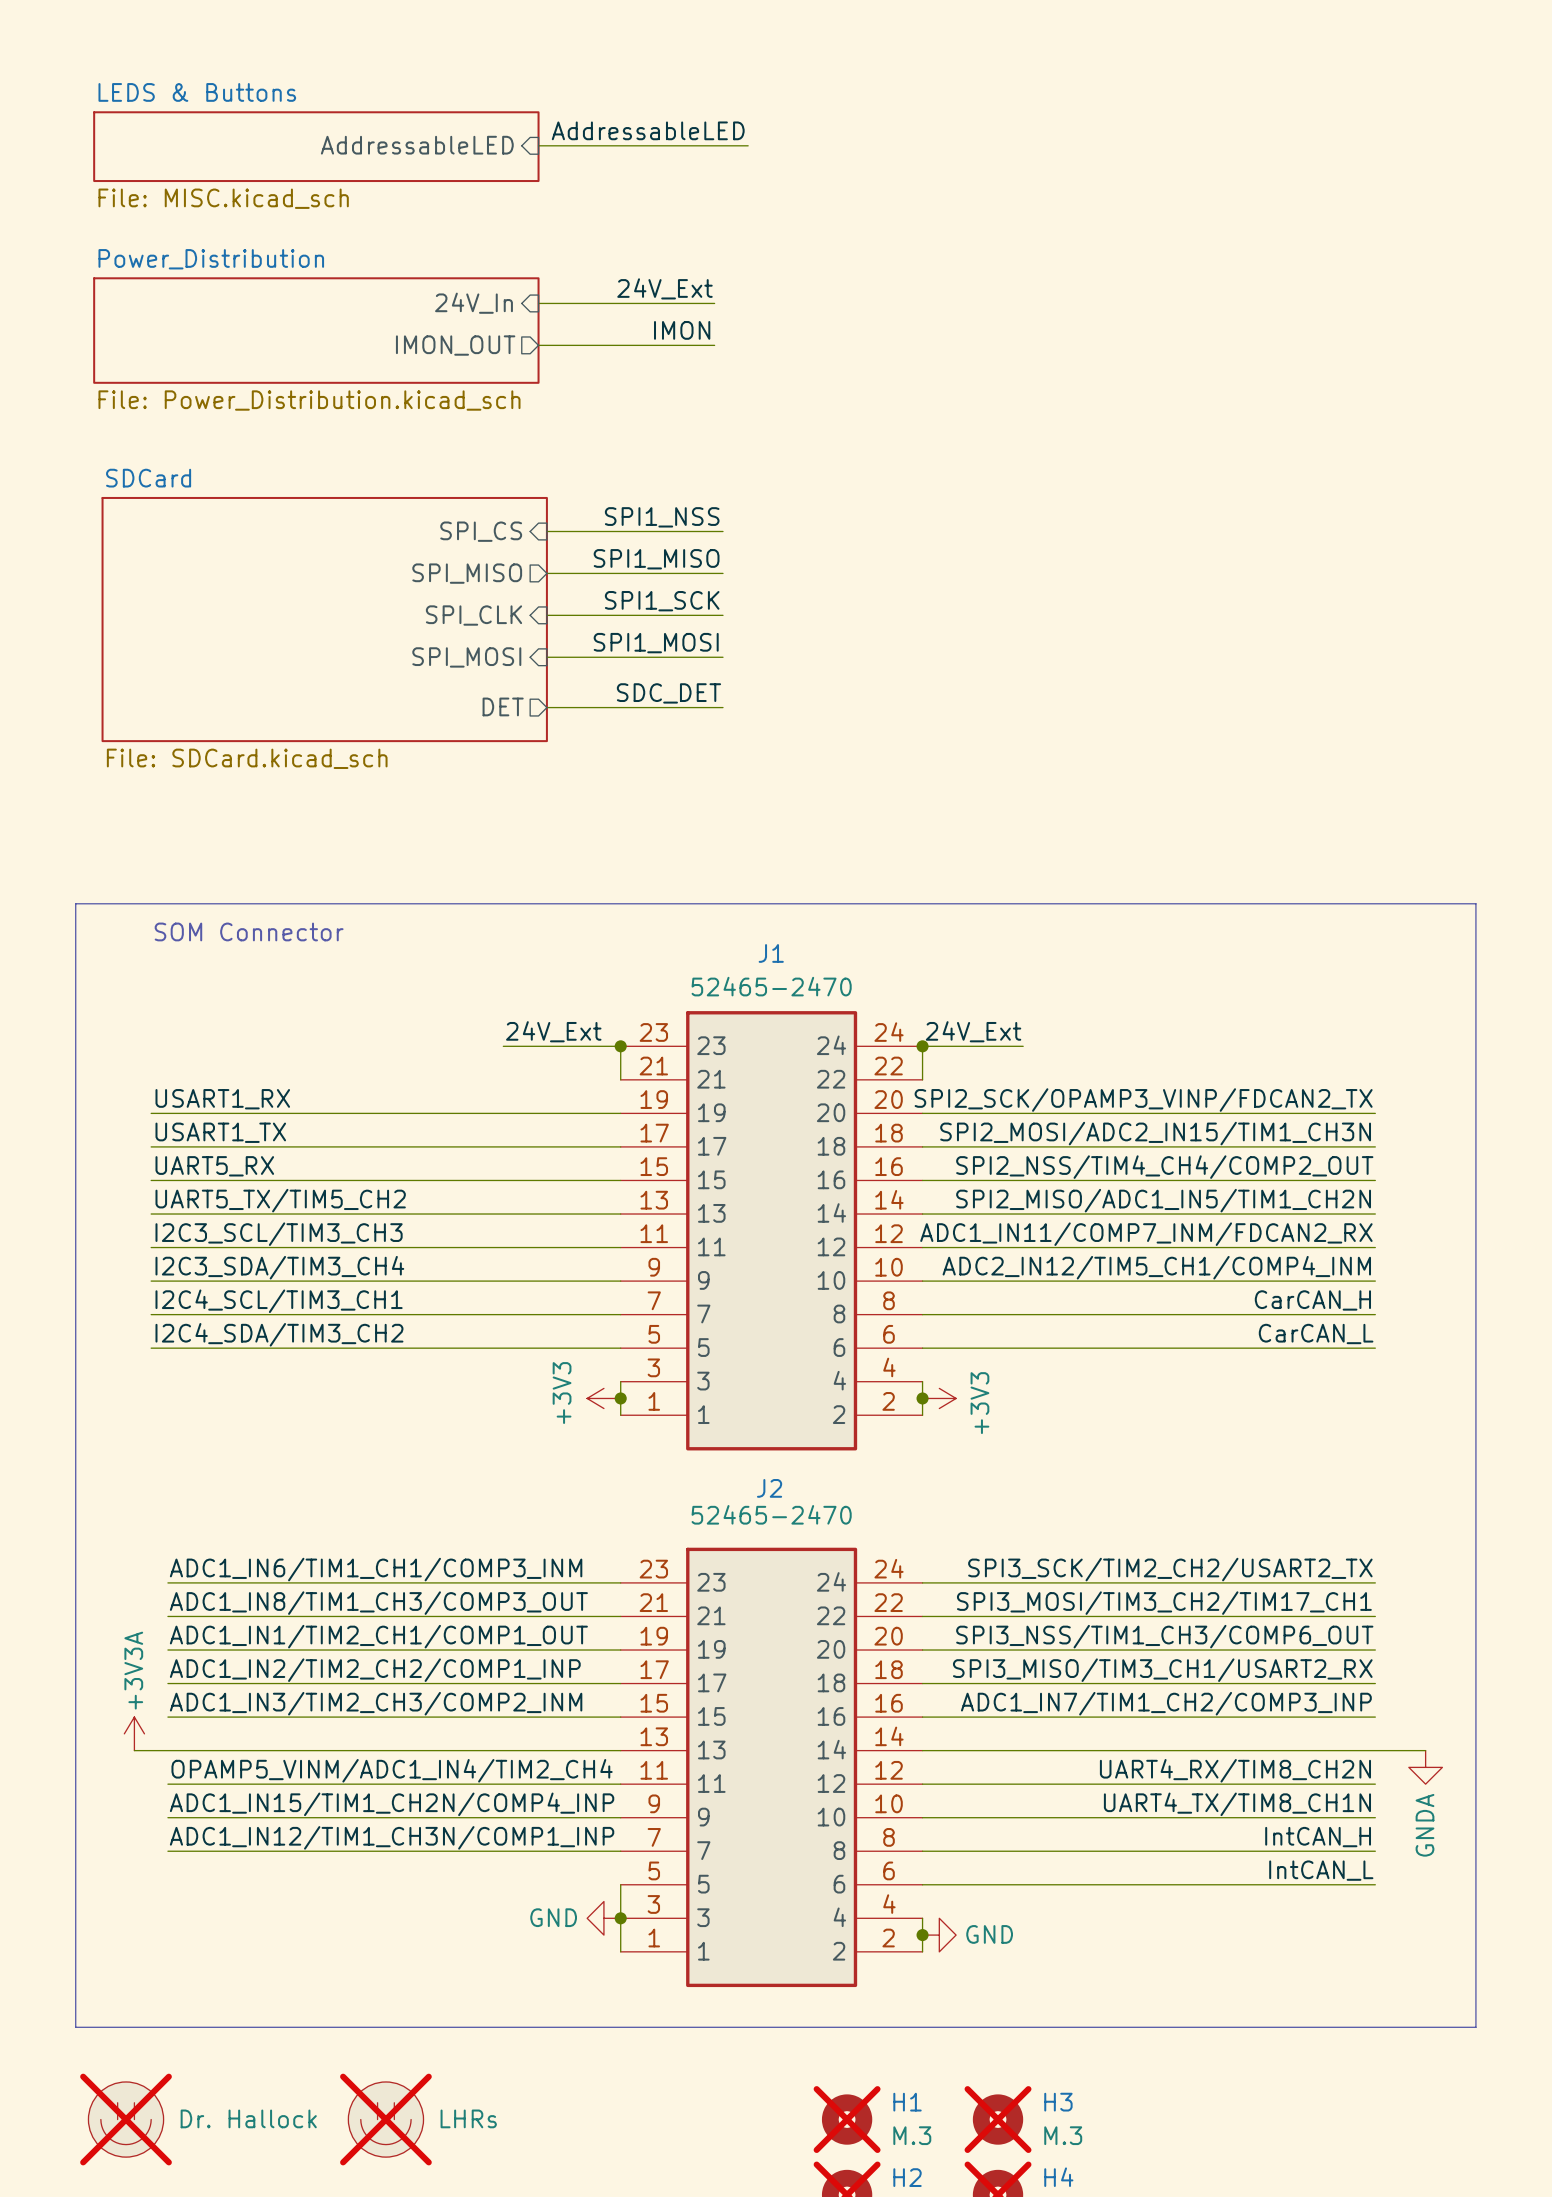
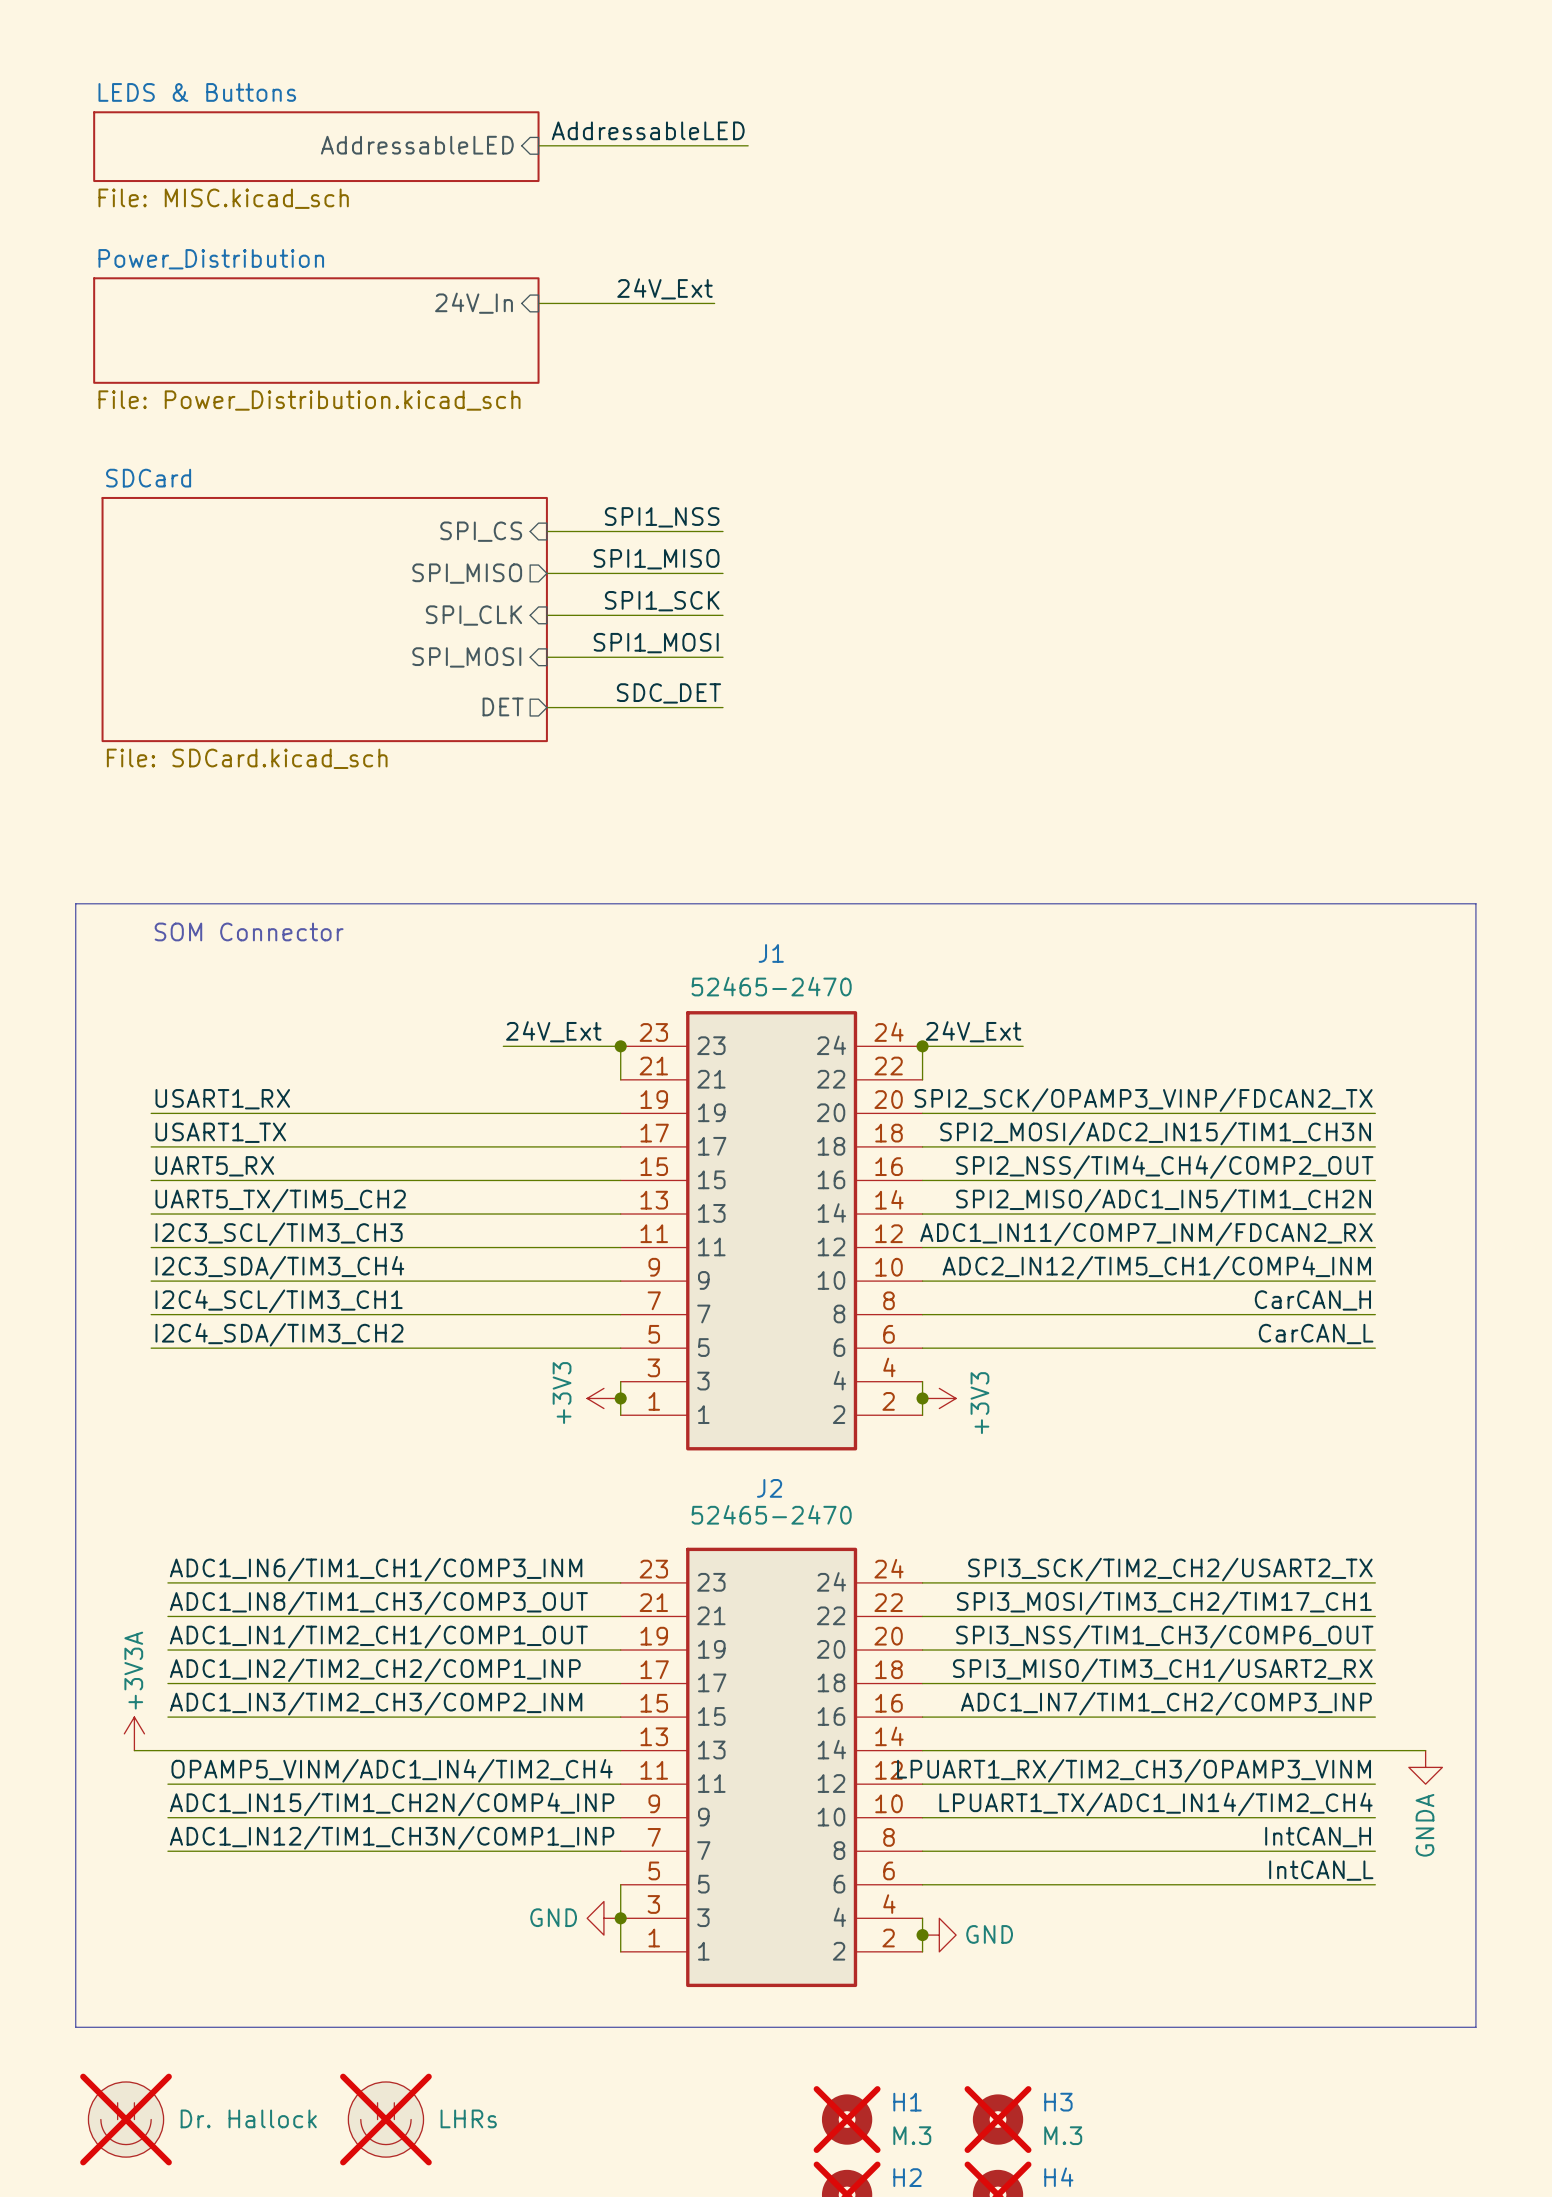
label: IMON (682, 330) -> none
sheet pin: IMON_OUT (455, 345) -> none
wire: (538, 345) (714, 345) -> none
label: UART4_RX/TIM8_CH2N (1235, 1770) -> LPUART1_RX/TIM2_CH3/OPAMP3_VINM (1134, 1770)
label: UART4_TX/TIM8_CH1N (1237, 1804) -> LPUART1_TX/ADC1_IN14/TIM2_CH4 (1156, 1804)

